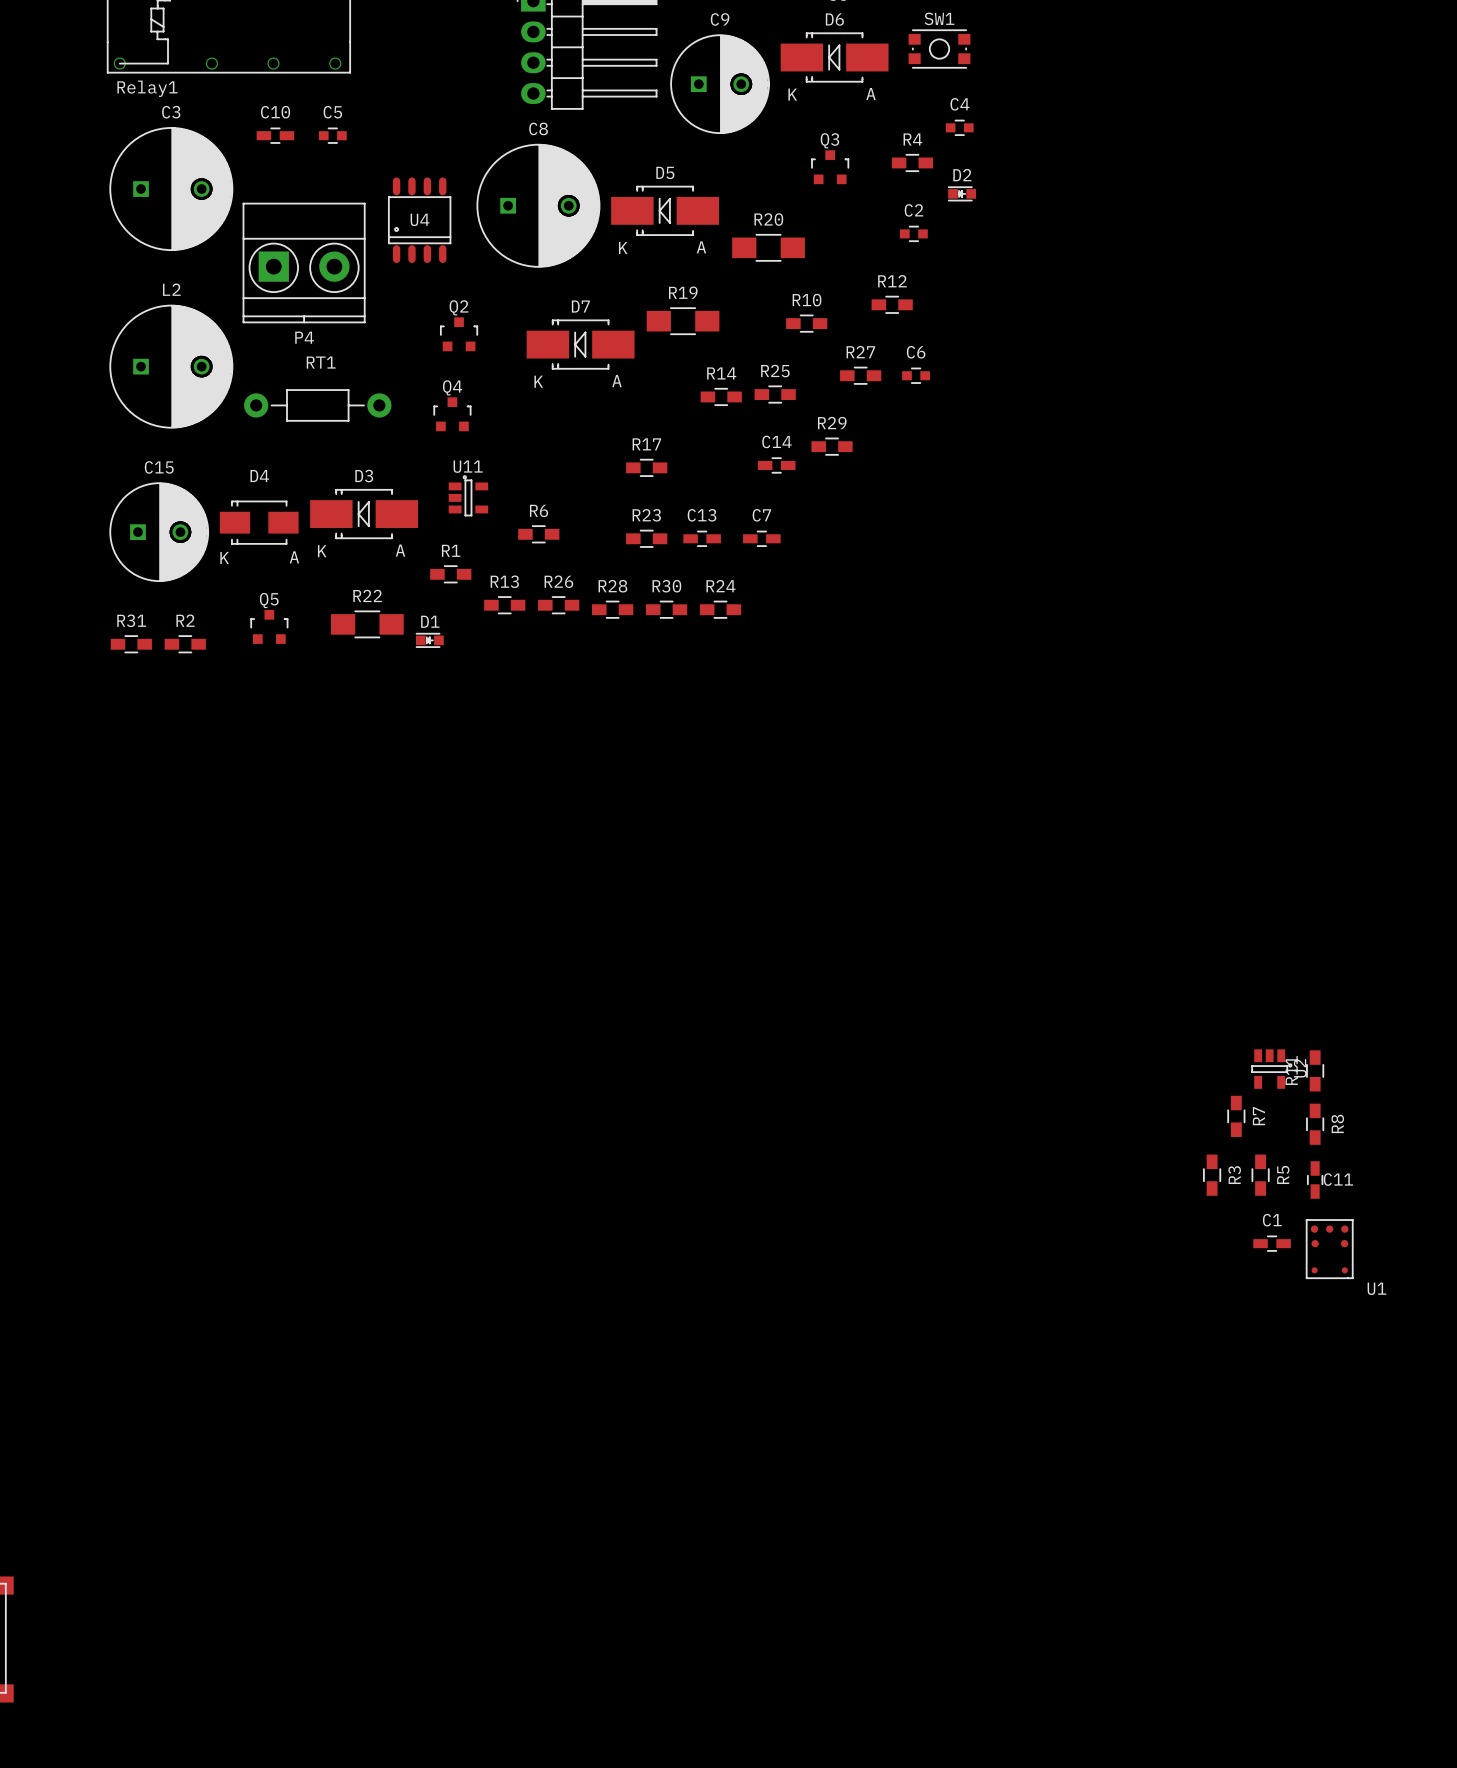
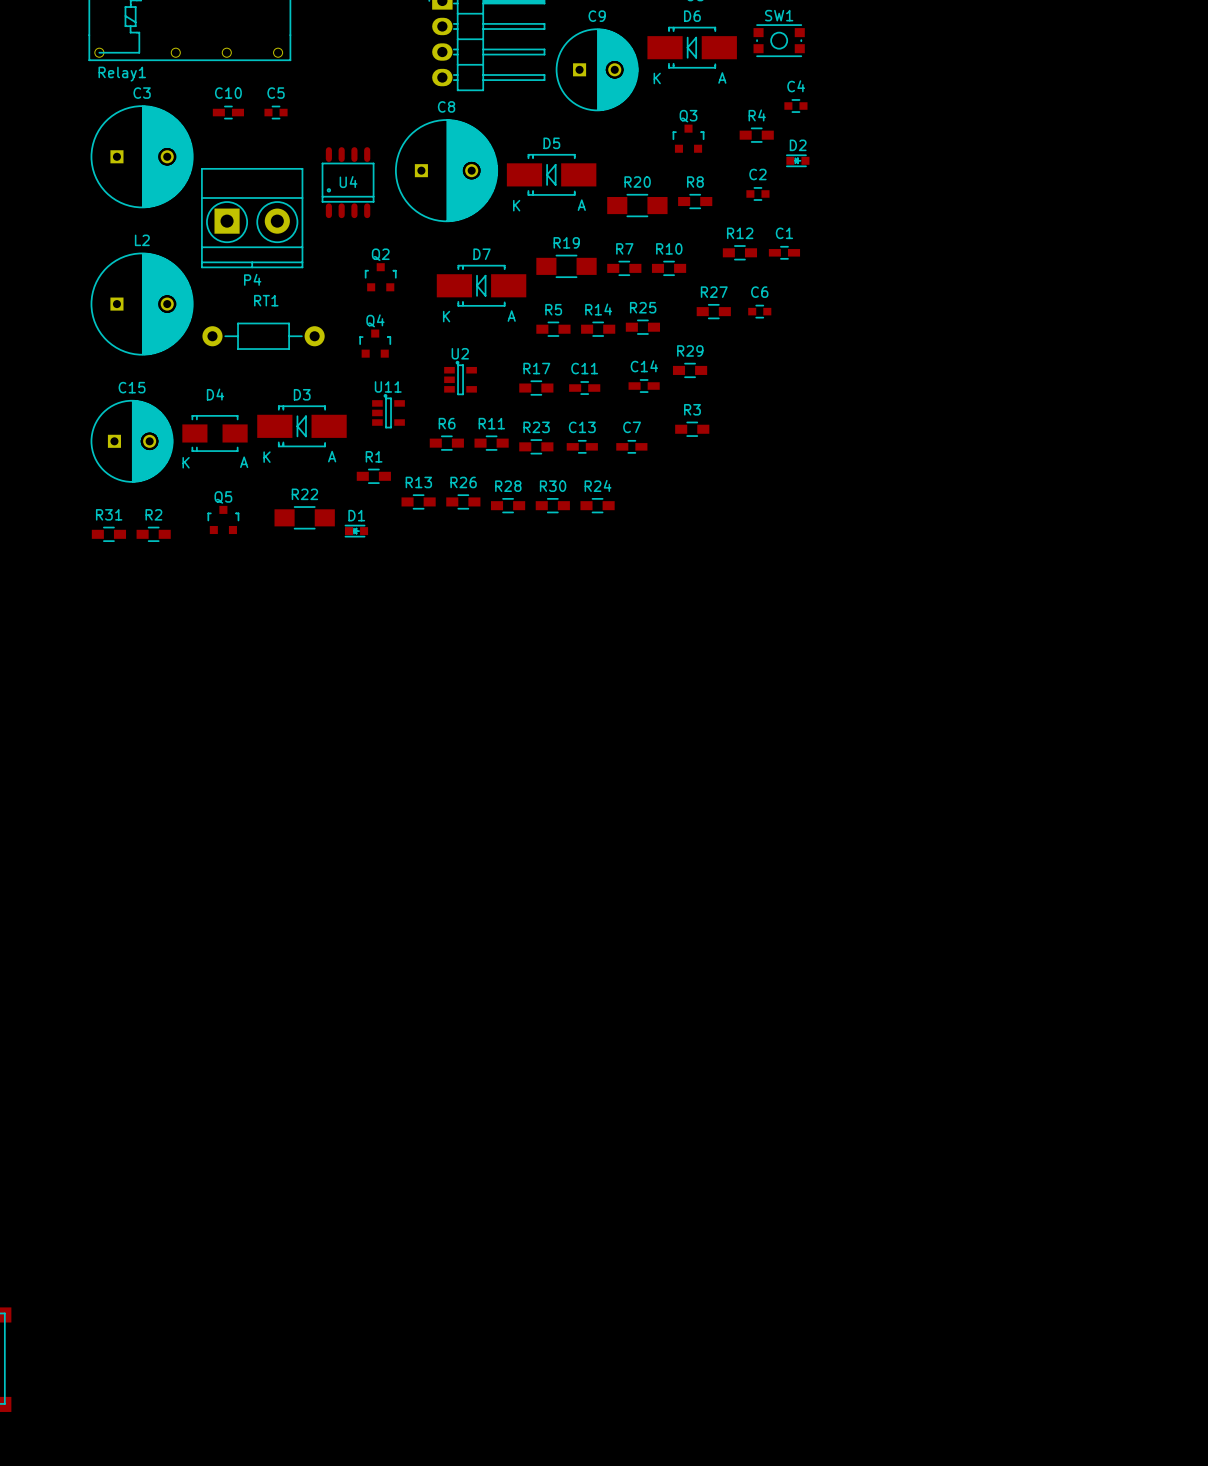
U2 rotation: 0° (1271, 1069) -> 90° counterclockwise (460, 378)
U2 position: (1271, 1069) -> (460, 378)
R11 rotation: 0° (1315, 1070) -> 90° clockwise (491, 443)
R11 position: (1315, 1070) -> (491, 443)
R7 rotation: 0° (1236, 1116) -> 90° clockwise (624, 268)
R7 position: (1236, 1116) -> (624, 268)
R7 name position: R7 (1258, 1116) -> R7 (624, 248)
R8 name position: R8 (1337, 1123) -> R8 (695, 182)
R8 rotation: 0° (1315, 1124) -> 90° clockwise (695, 201)
R8 position: (1315, 1124) -> (695, 201)
R5 name position: R5 (1283, 1174) -> R5 (553, 309)
R3 rotation: 0° (1212, 1175) -> 90° clockwise (692, 429)
R3 position: (1212, 1175) -> (692, 429)
R3 name position: R3 (1234, 1175) -> R3 (692, 409)
R5 rotation: 0° (1260, 1175) -> 90° clockwise (553, 329)
R5 position: (1260, 1175) -> (553, 329)
C11 name position: C11 (1338, 1179) -> C11 (584, 368)
C11 rotation: 0° (1315, 1180) -> 90° clockwise (584, 388)
C11 position: (1315, 1180) -> (584, 388)
C1 position: (1272, 1243) -> (784, 252)
U1: (1329, 1249) -> none

